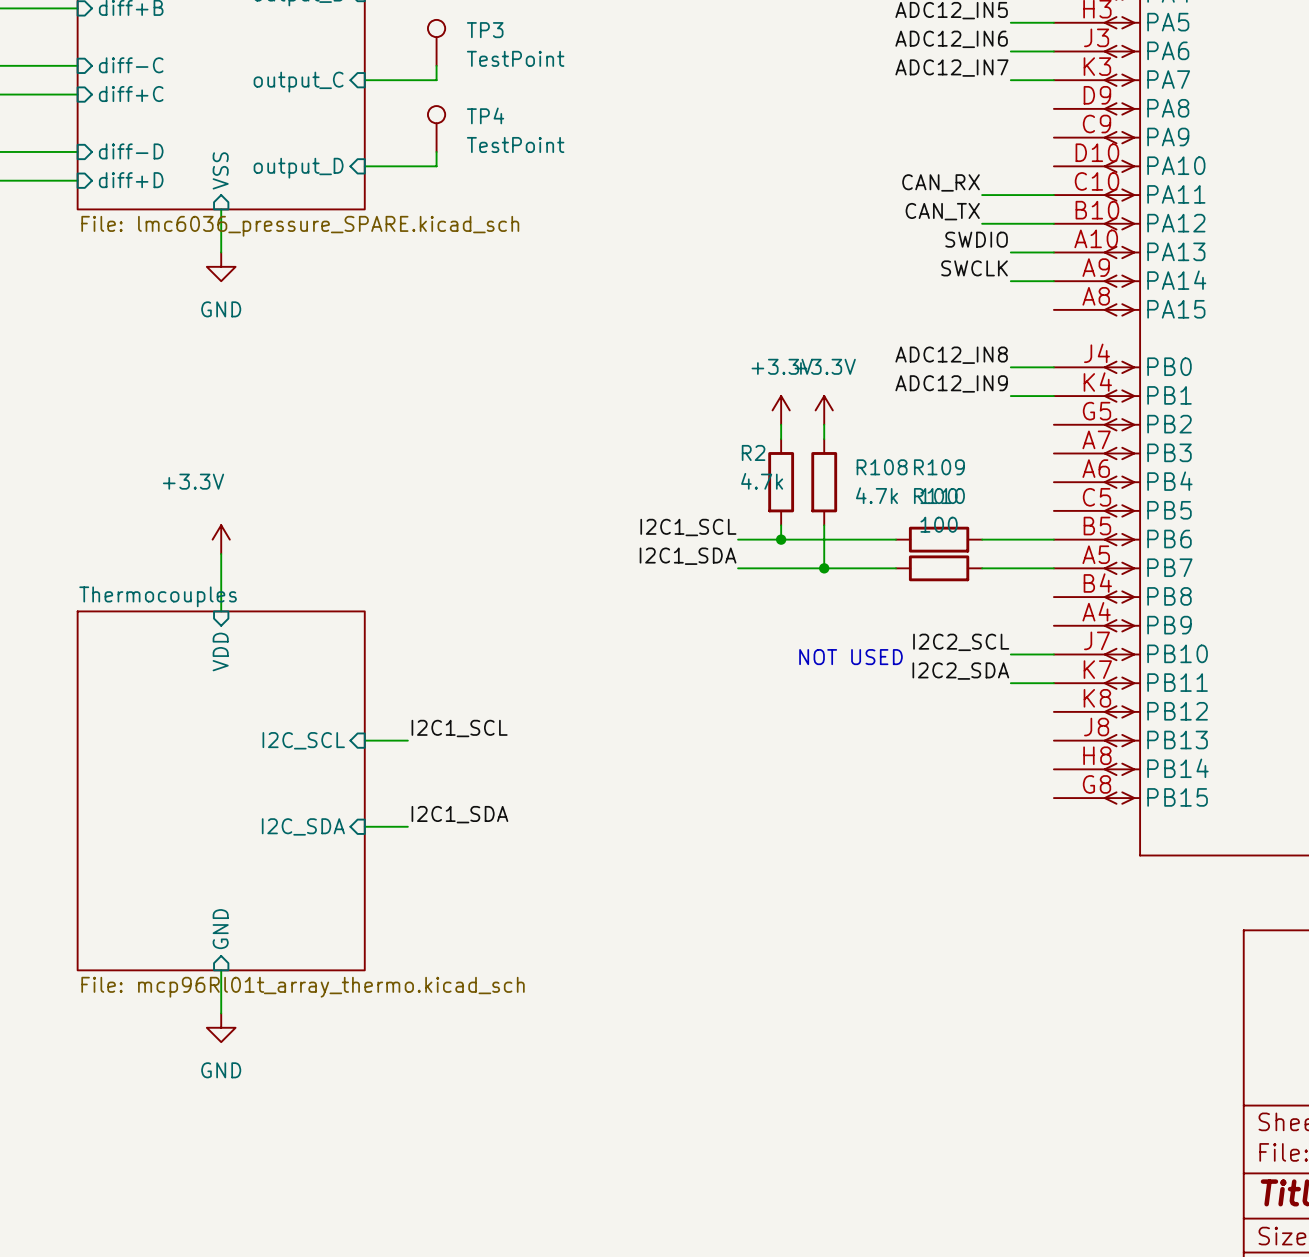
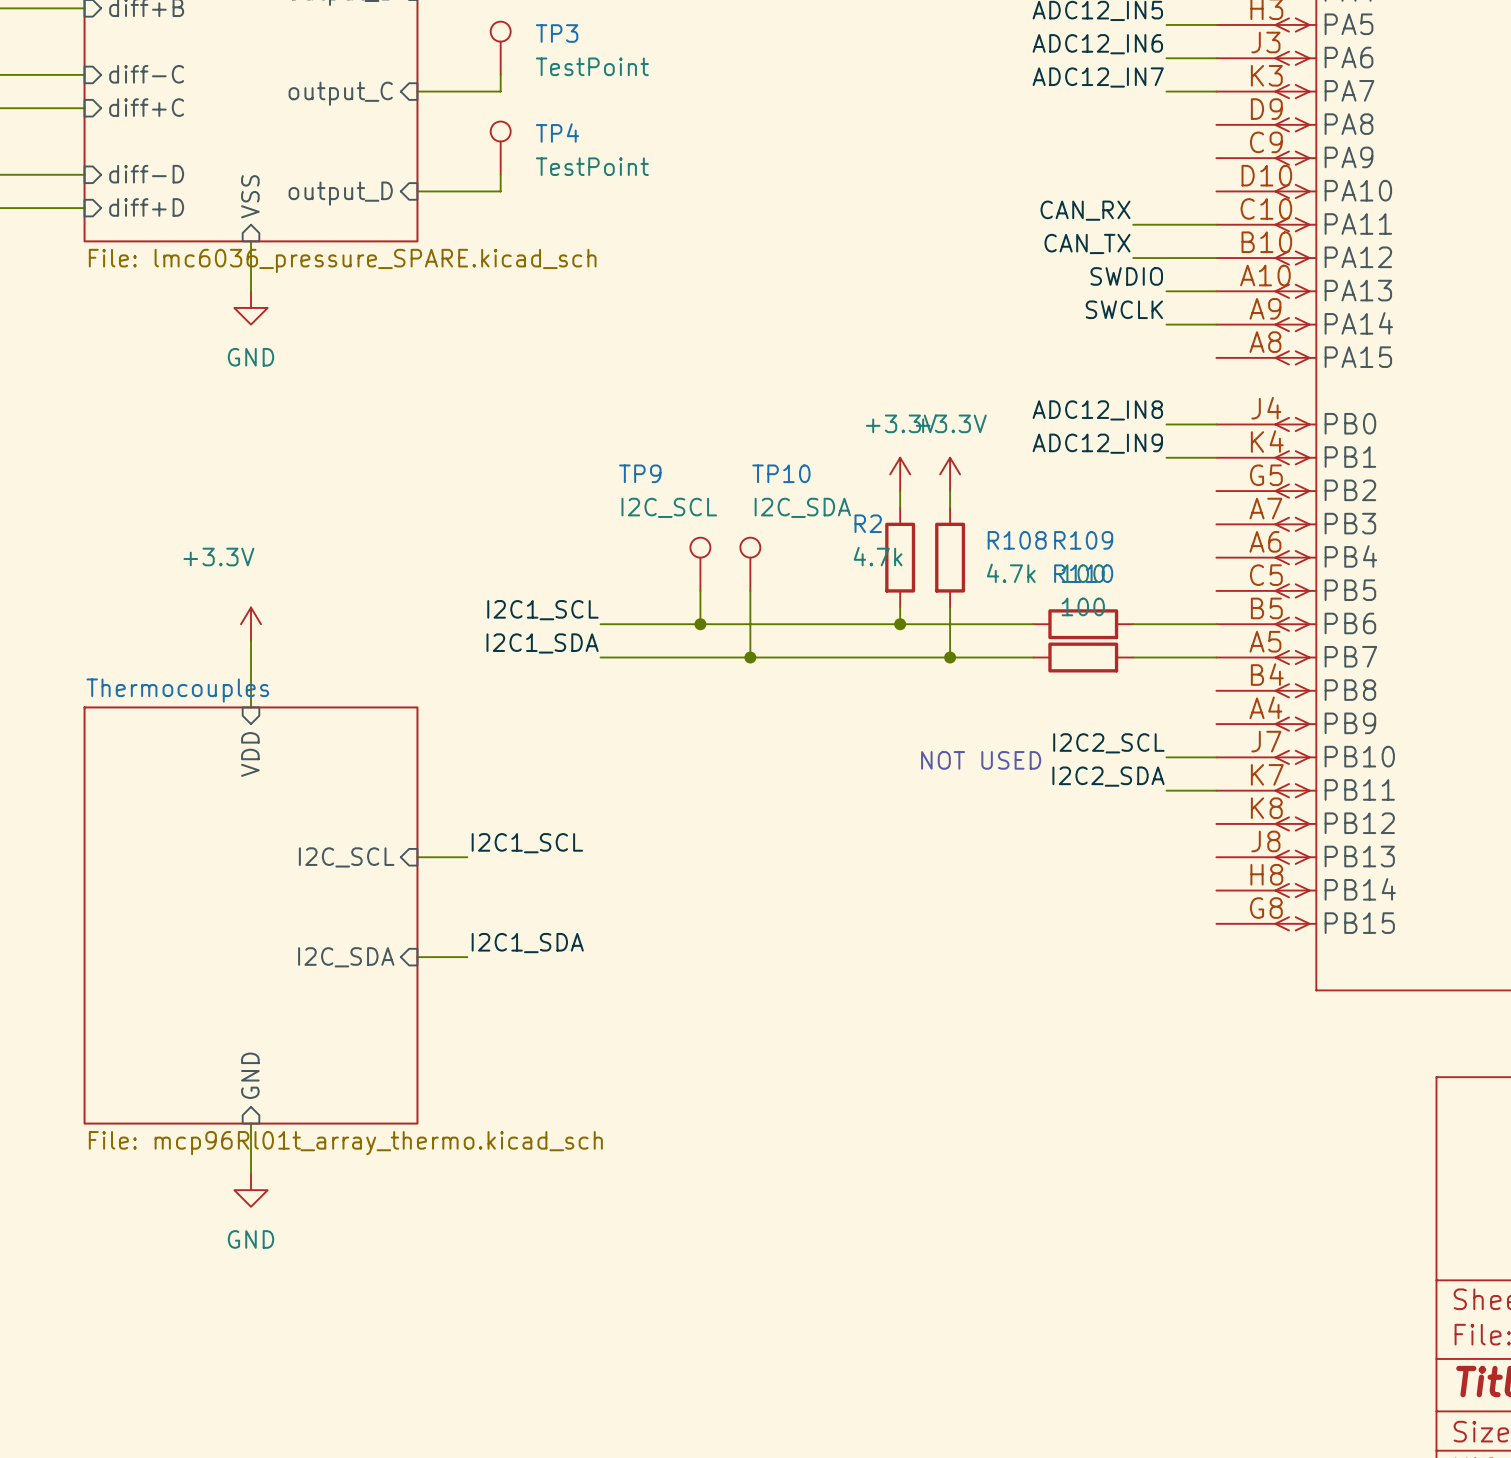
TP9: none -> I2C_SCL (700, 564)
TP10: none -> I2C_SDA (750, 564)
wire: none -> (700, 590) (700, 624)
wire: none -> (750, 590) (750, 657)
label position: I2C1_SCL (688, 527) -> I2C1_SCL (542, 610)
wire: none -> (600, 624) (850, 624)
junction: none -> (700, 624)
label position: I2C1_SDA (688, 556) -> I2C1_SDA (542, 643)
wire: none -> (600, 657) (850, 657)
junction: none -> (750, 657)

